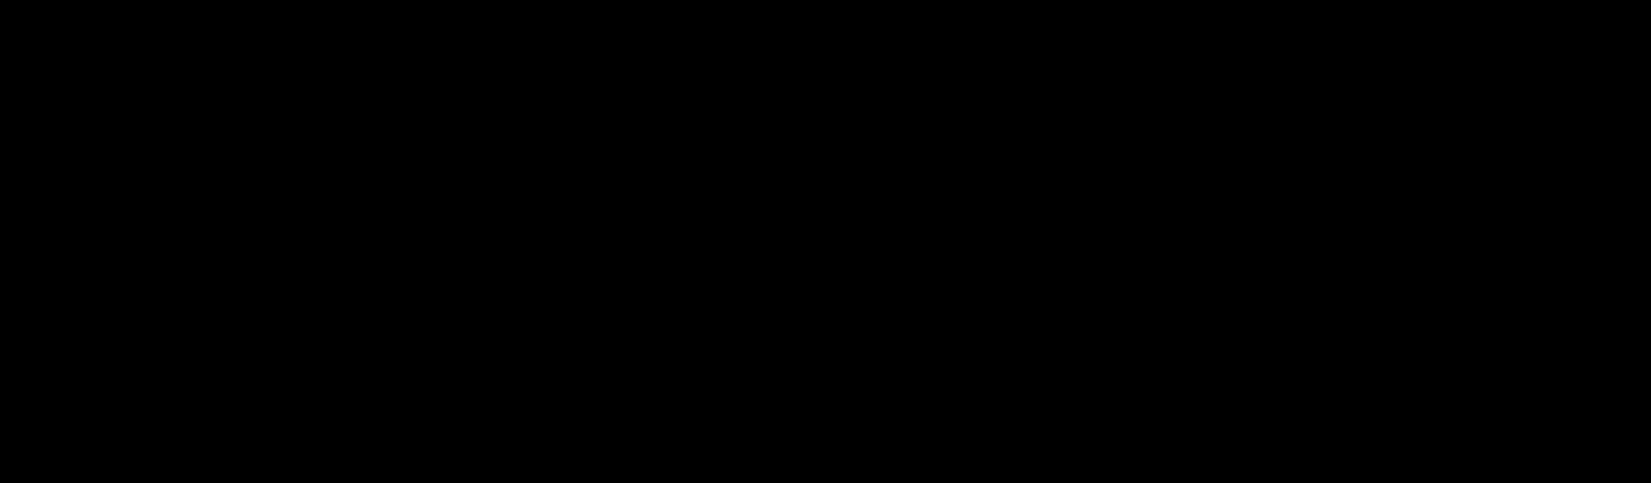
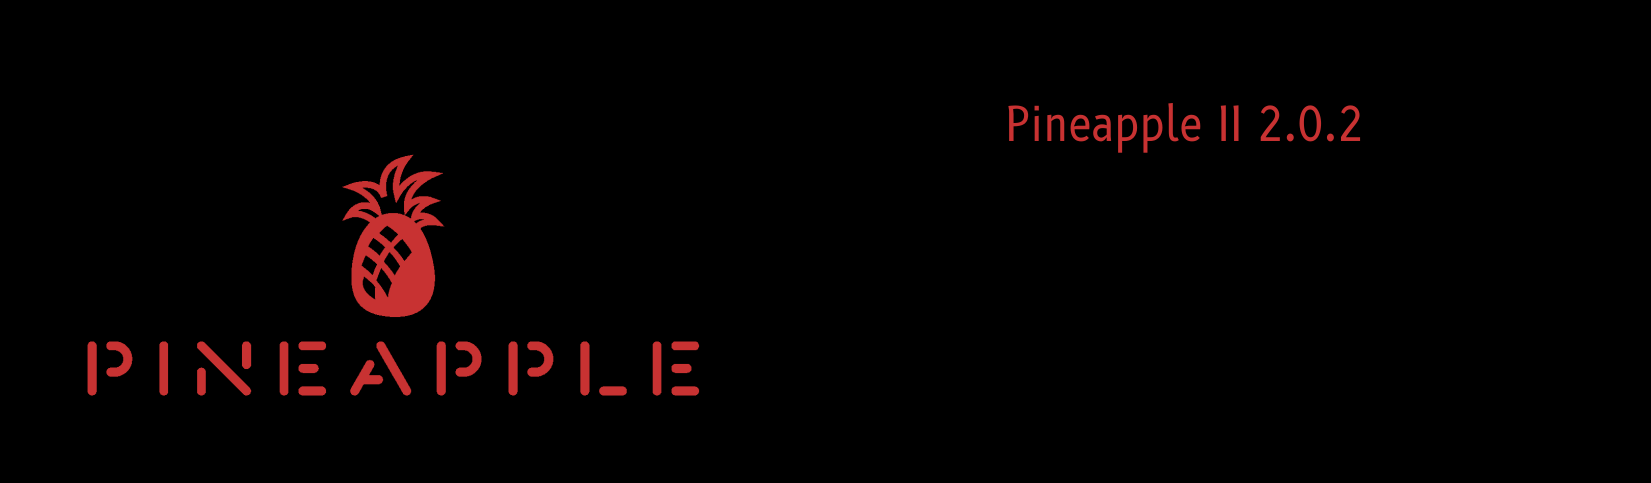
text: none -> Pineapple II 2.0.2 (1184, 127)
part: none -> (393, 275)

